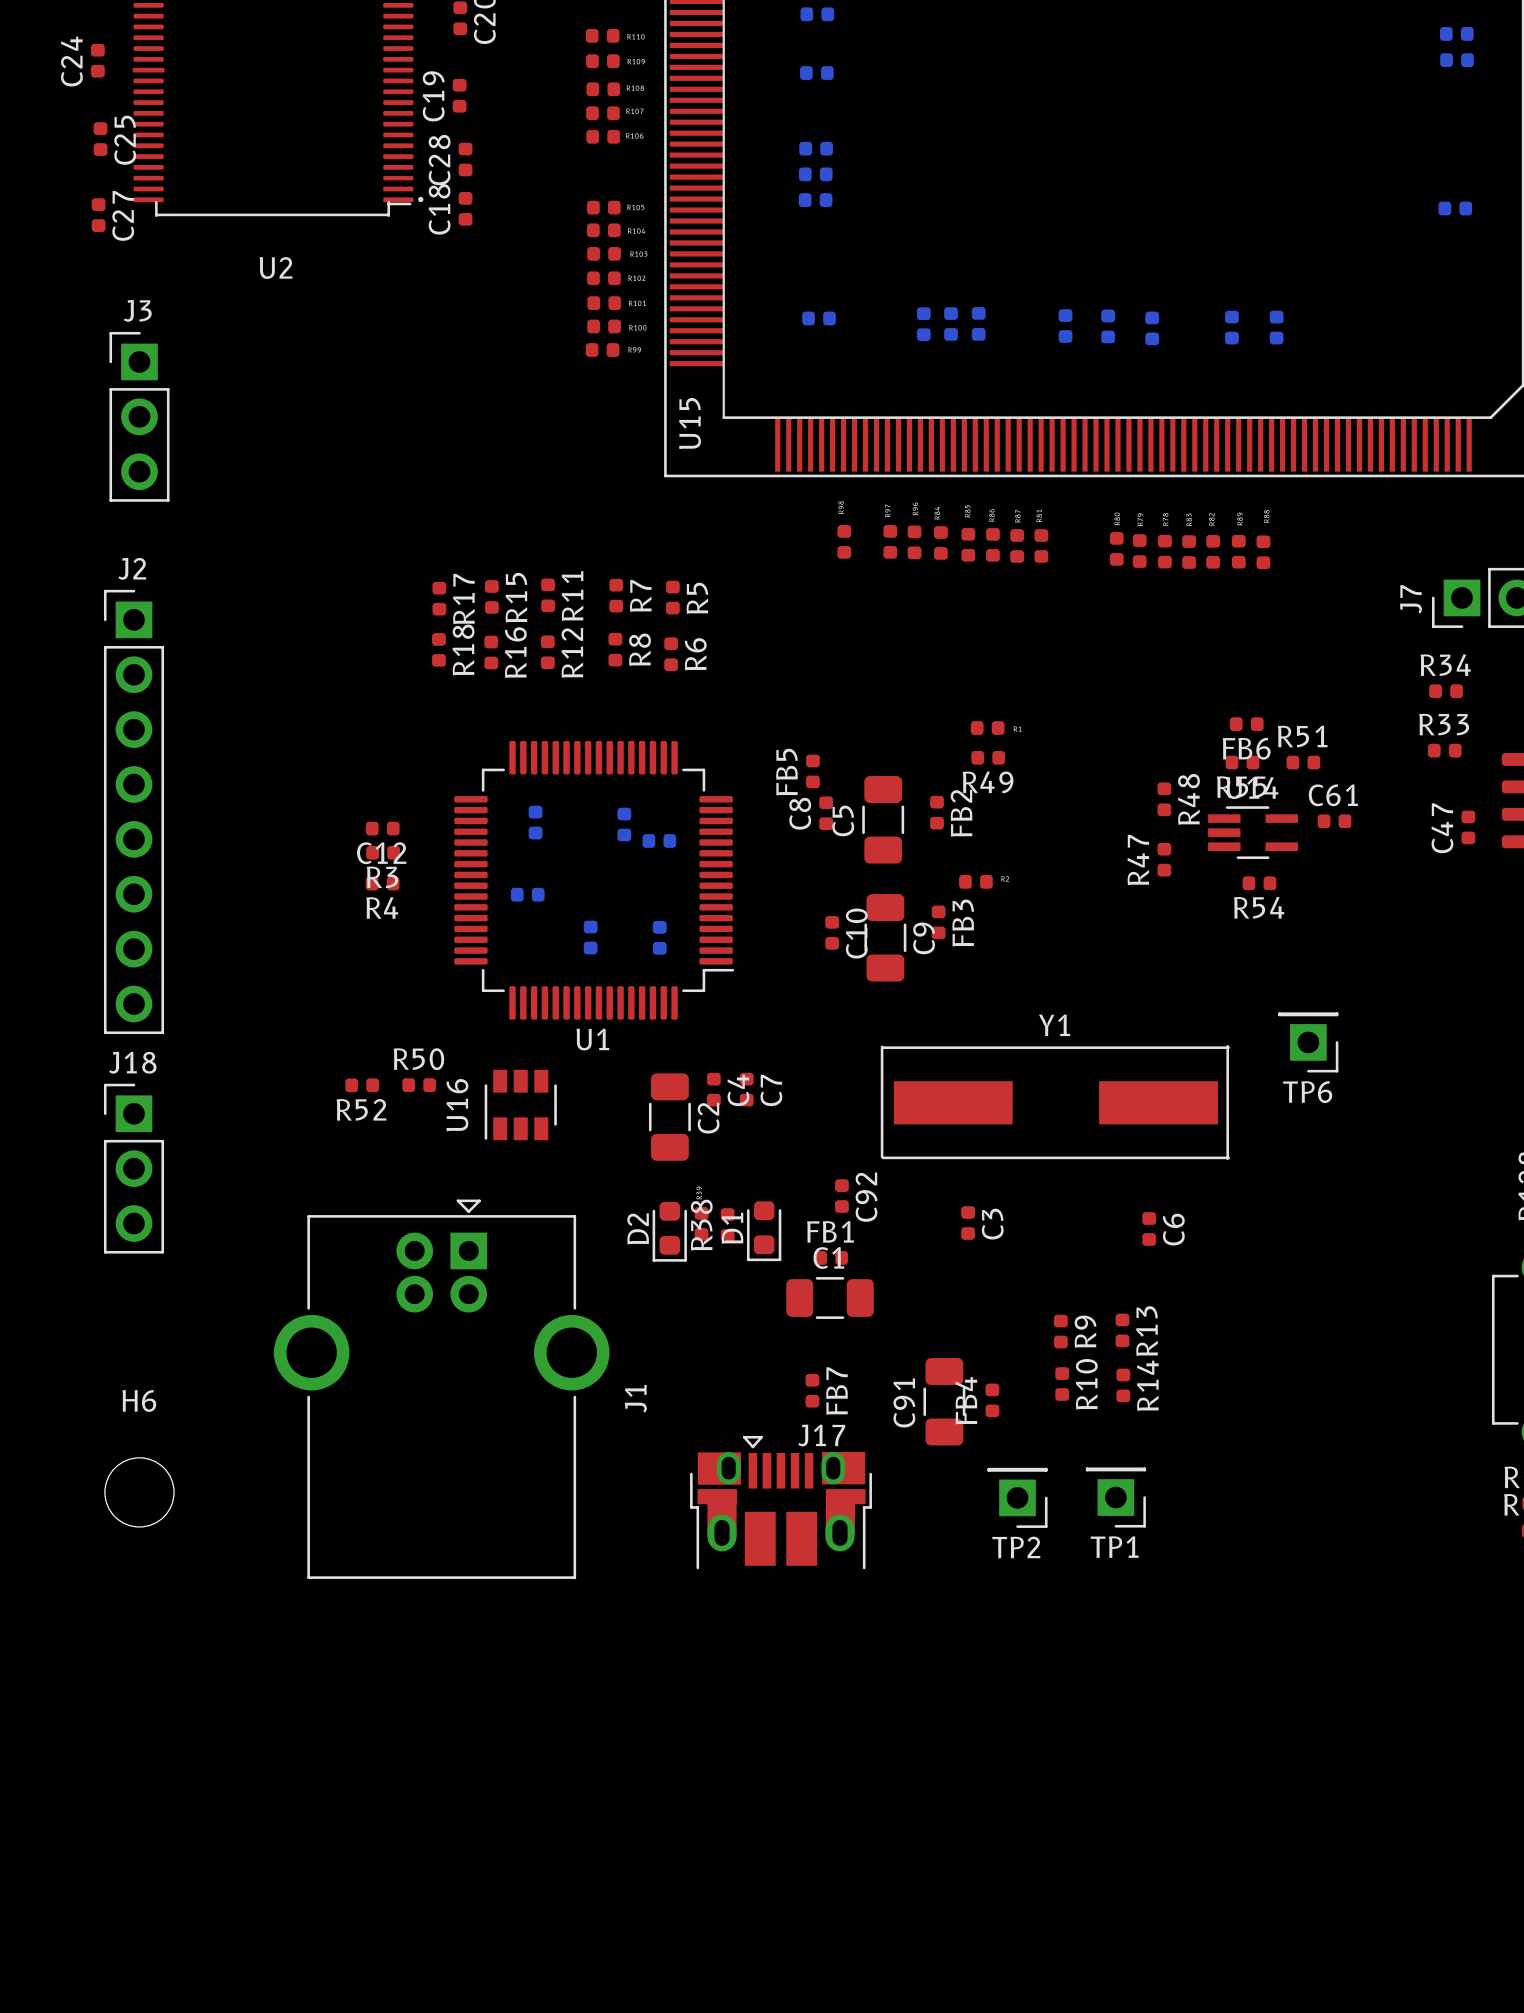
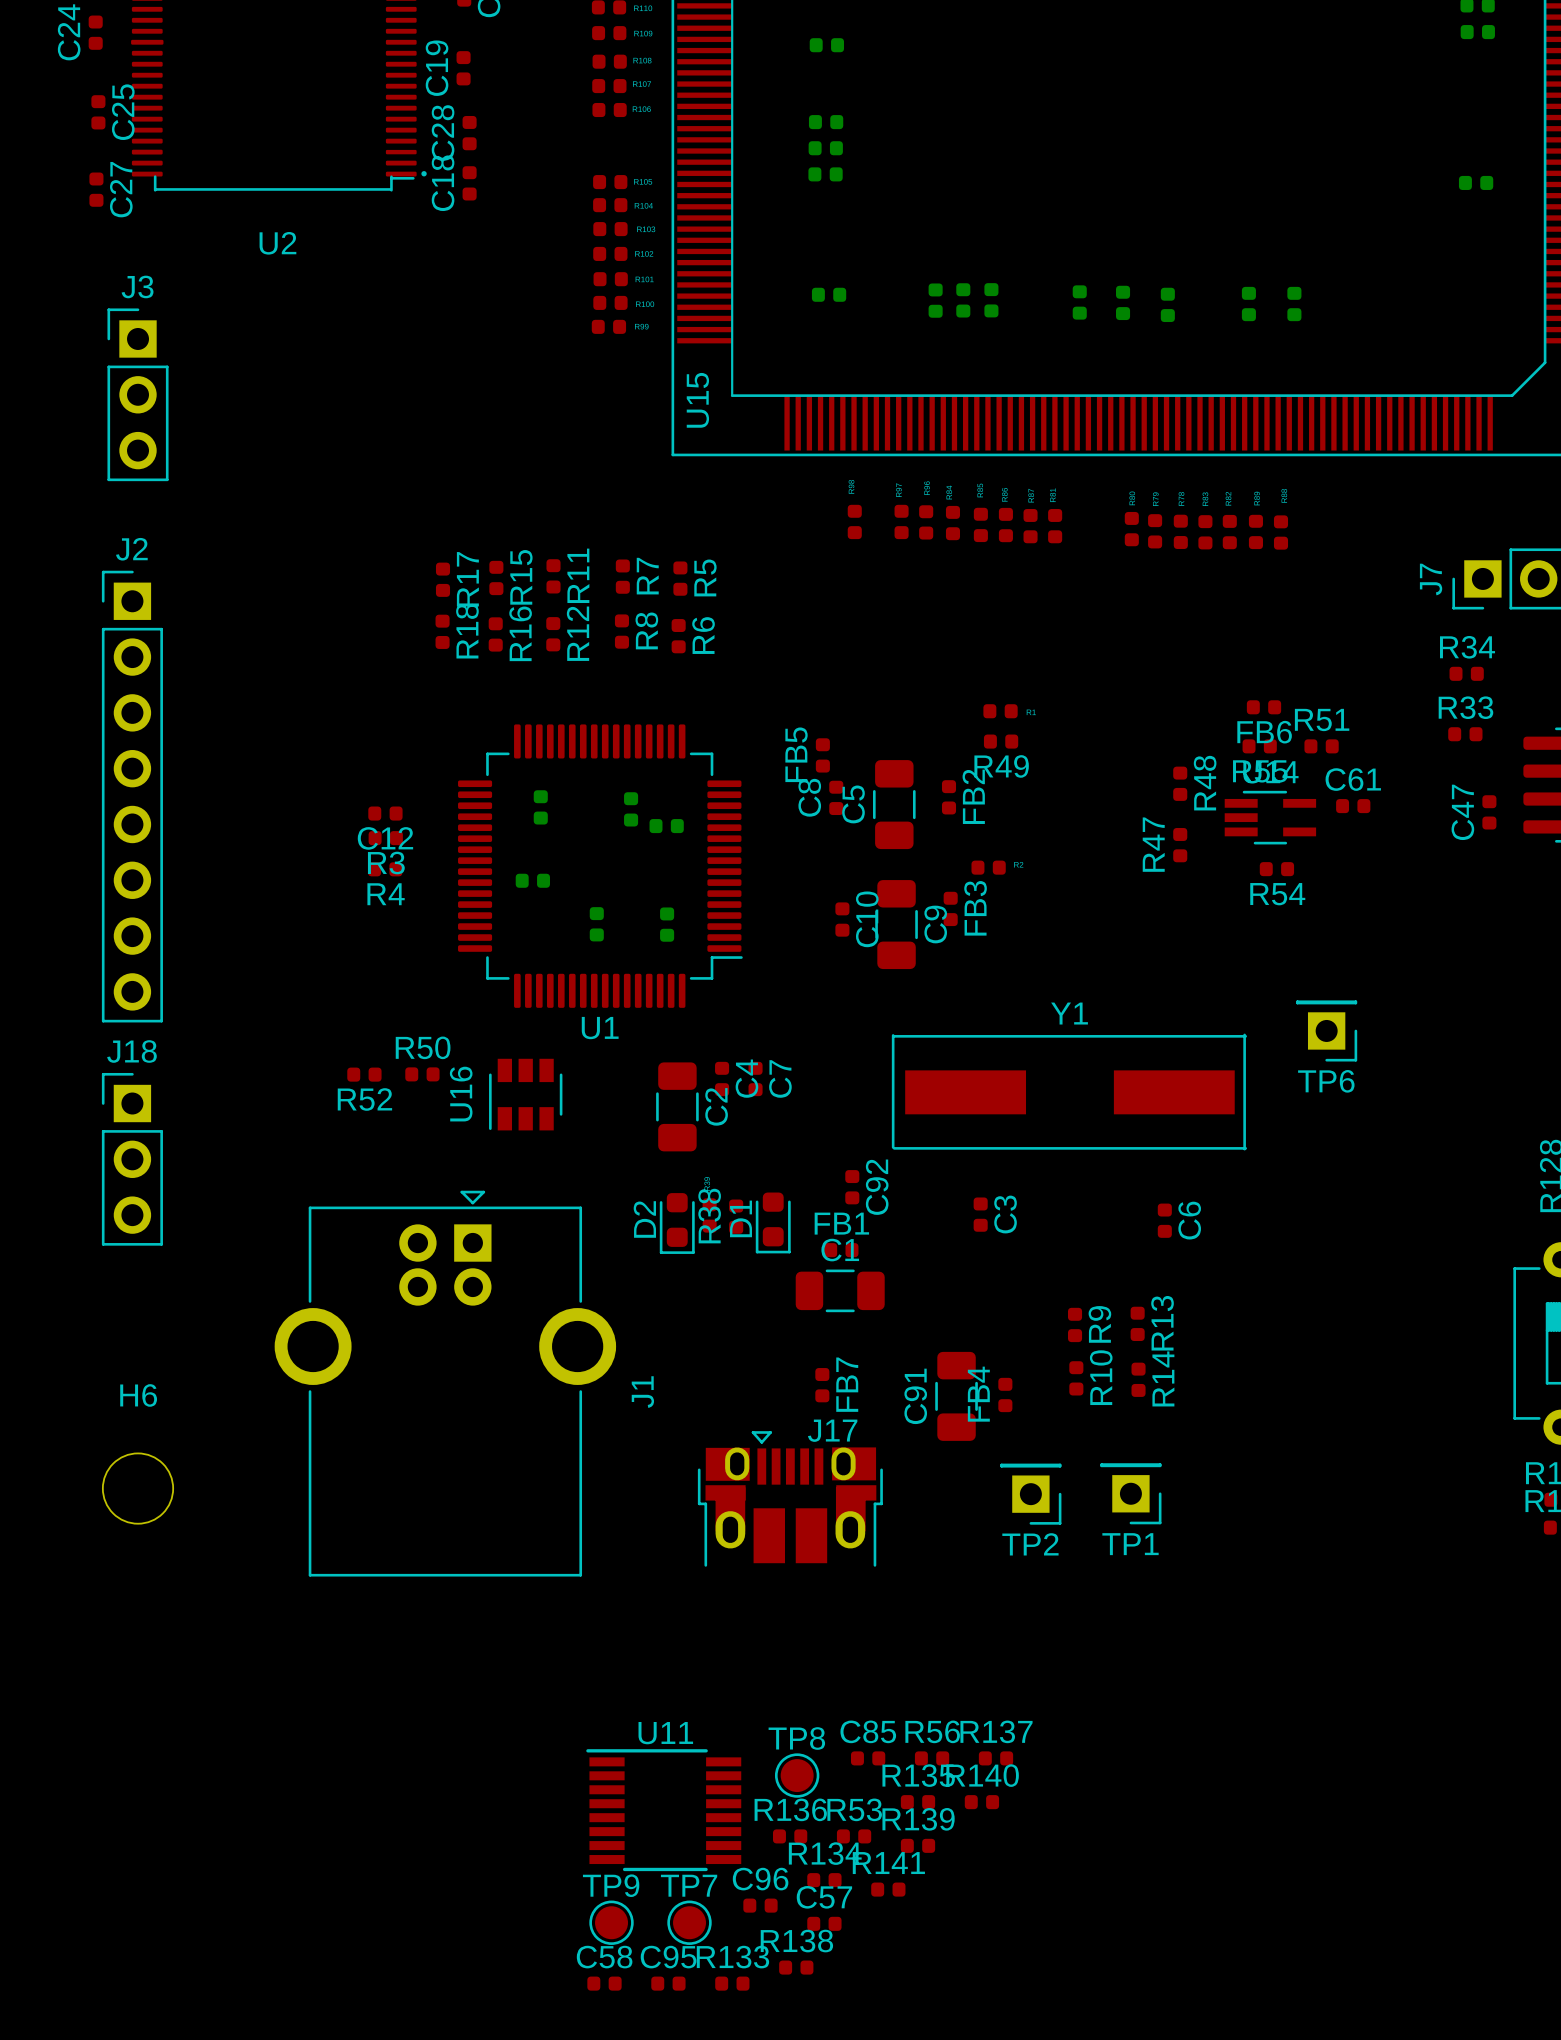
C85: none -> (868, 1758)
R56: none -> (932, 1758)
R137: none -> (995, 1758)
TP8: none -> (797, 1775)
R135: none -> (918, 1802)
R140: none -> (981, 1802)
U11: none -> (663, 1810)
R136: none -> (790, 1836)
R53: none -> (854, 1836)
R139: none -> (918, 1845)
R134: none -> (824, 1880)
R141: none -> (888, 1889)
C96: none -> (760, 1905)
TP9: none -> (611, 1922)
TP7: none -> (689, 1922)
C57: none -> (824, 1923)
R138: none -> (796, 1967)
C58: none -> (604, 1983)
C95: none -> (668, 1983)
R133: none -> (732, 1983)

